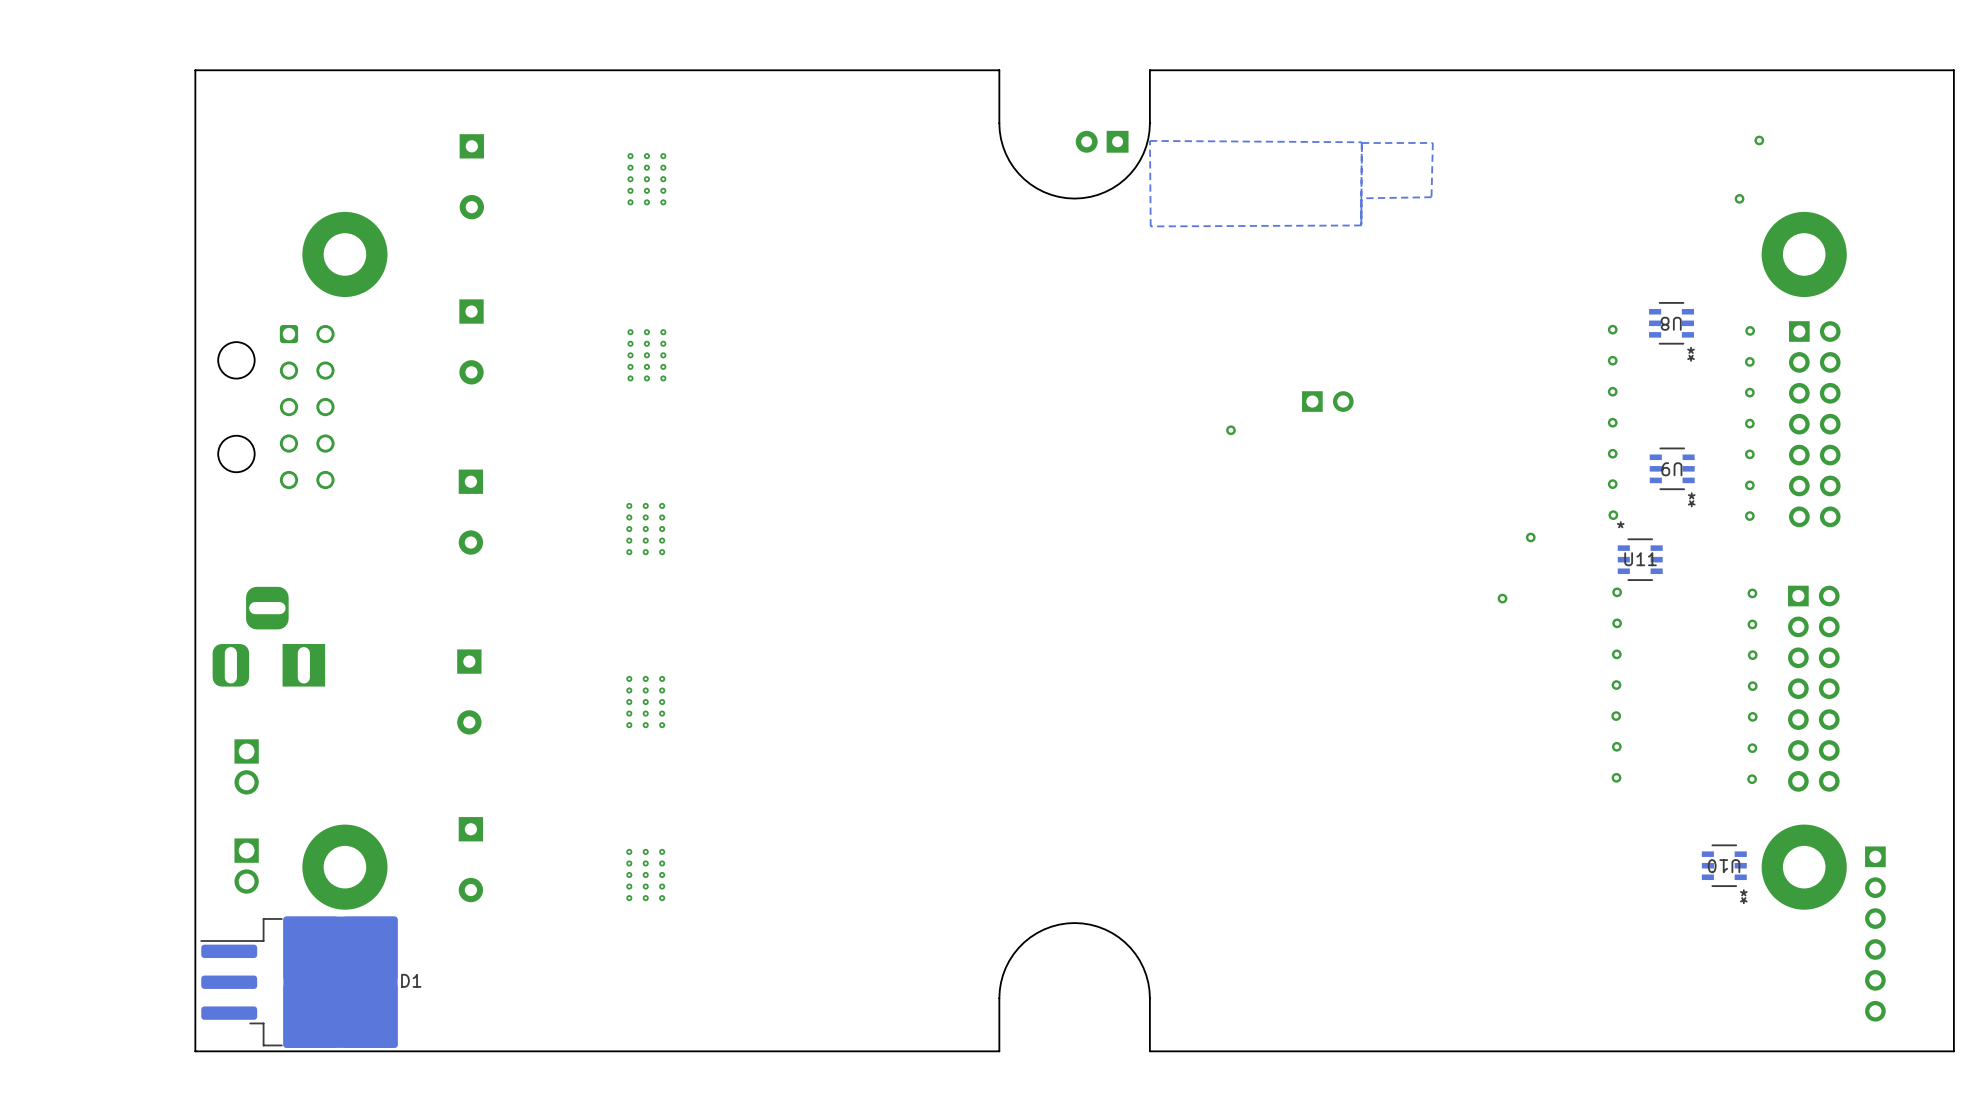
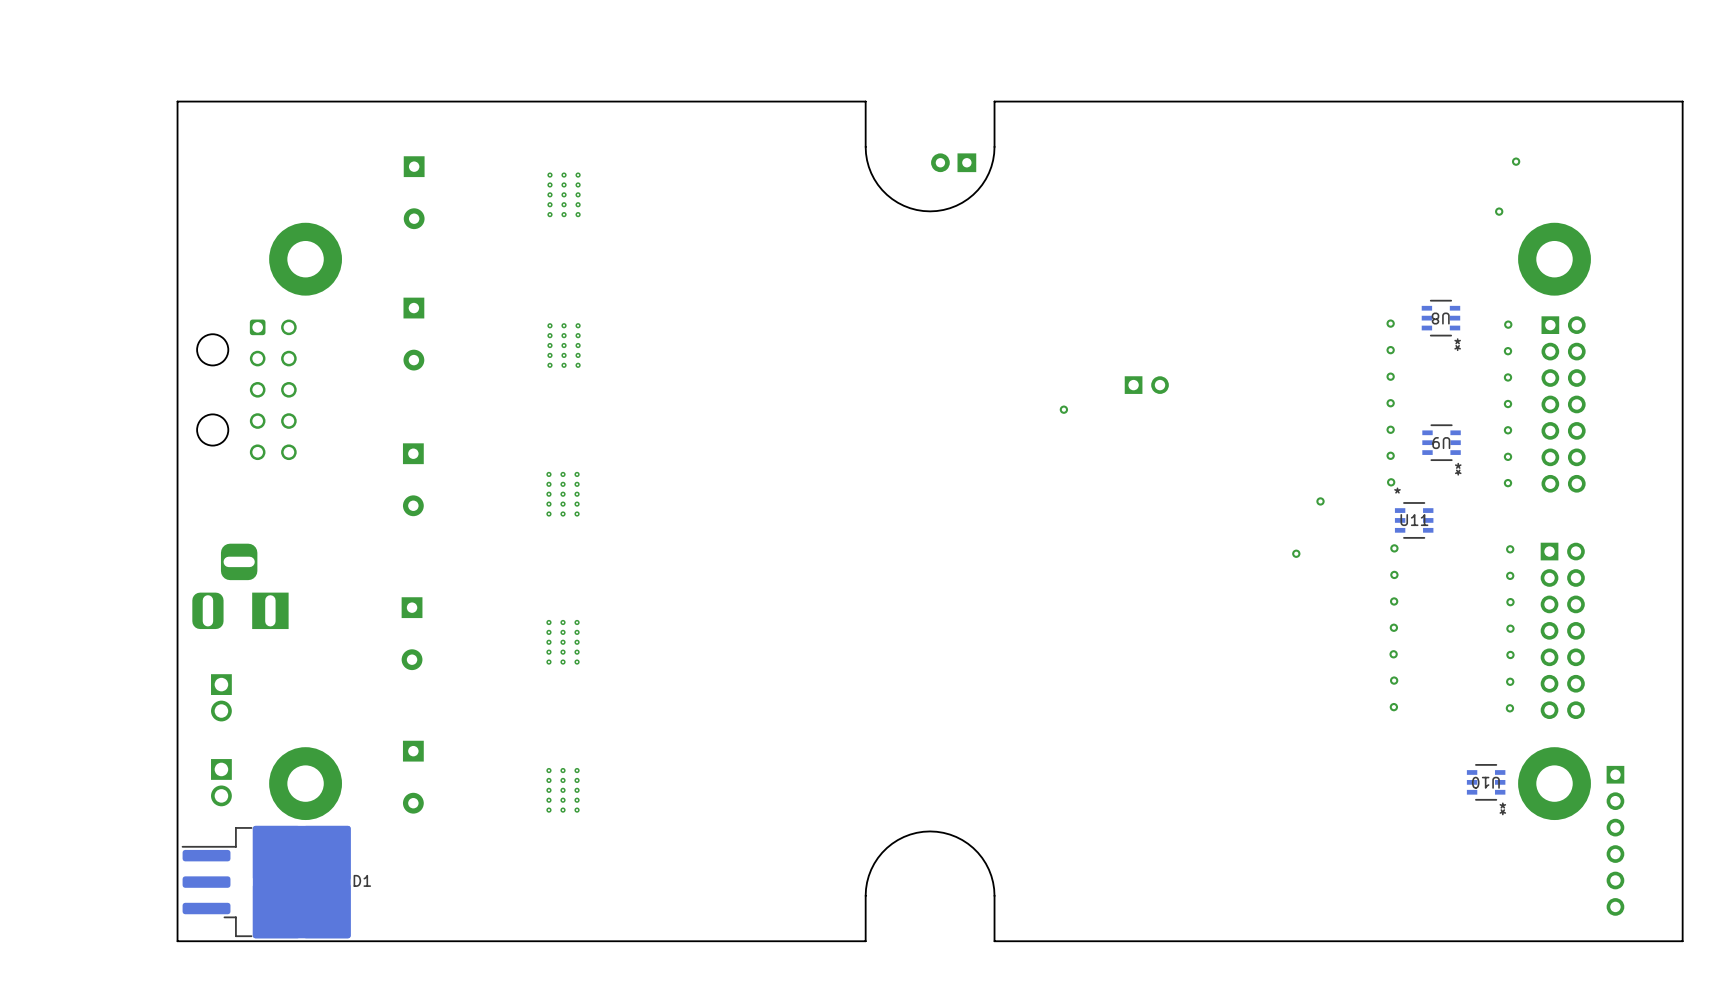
zone outline: (1149, 140) (1150, 226) (1361, 225) (1361, 142) (1149, 140) -> none
zone outline: (1432, 142) (1431, 197) (1361, 198) (1361, 142) (1432, 142) -> none

